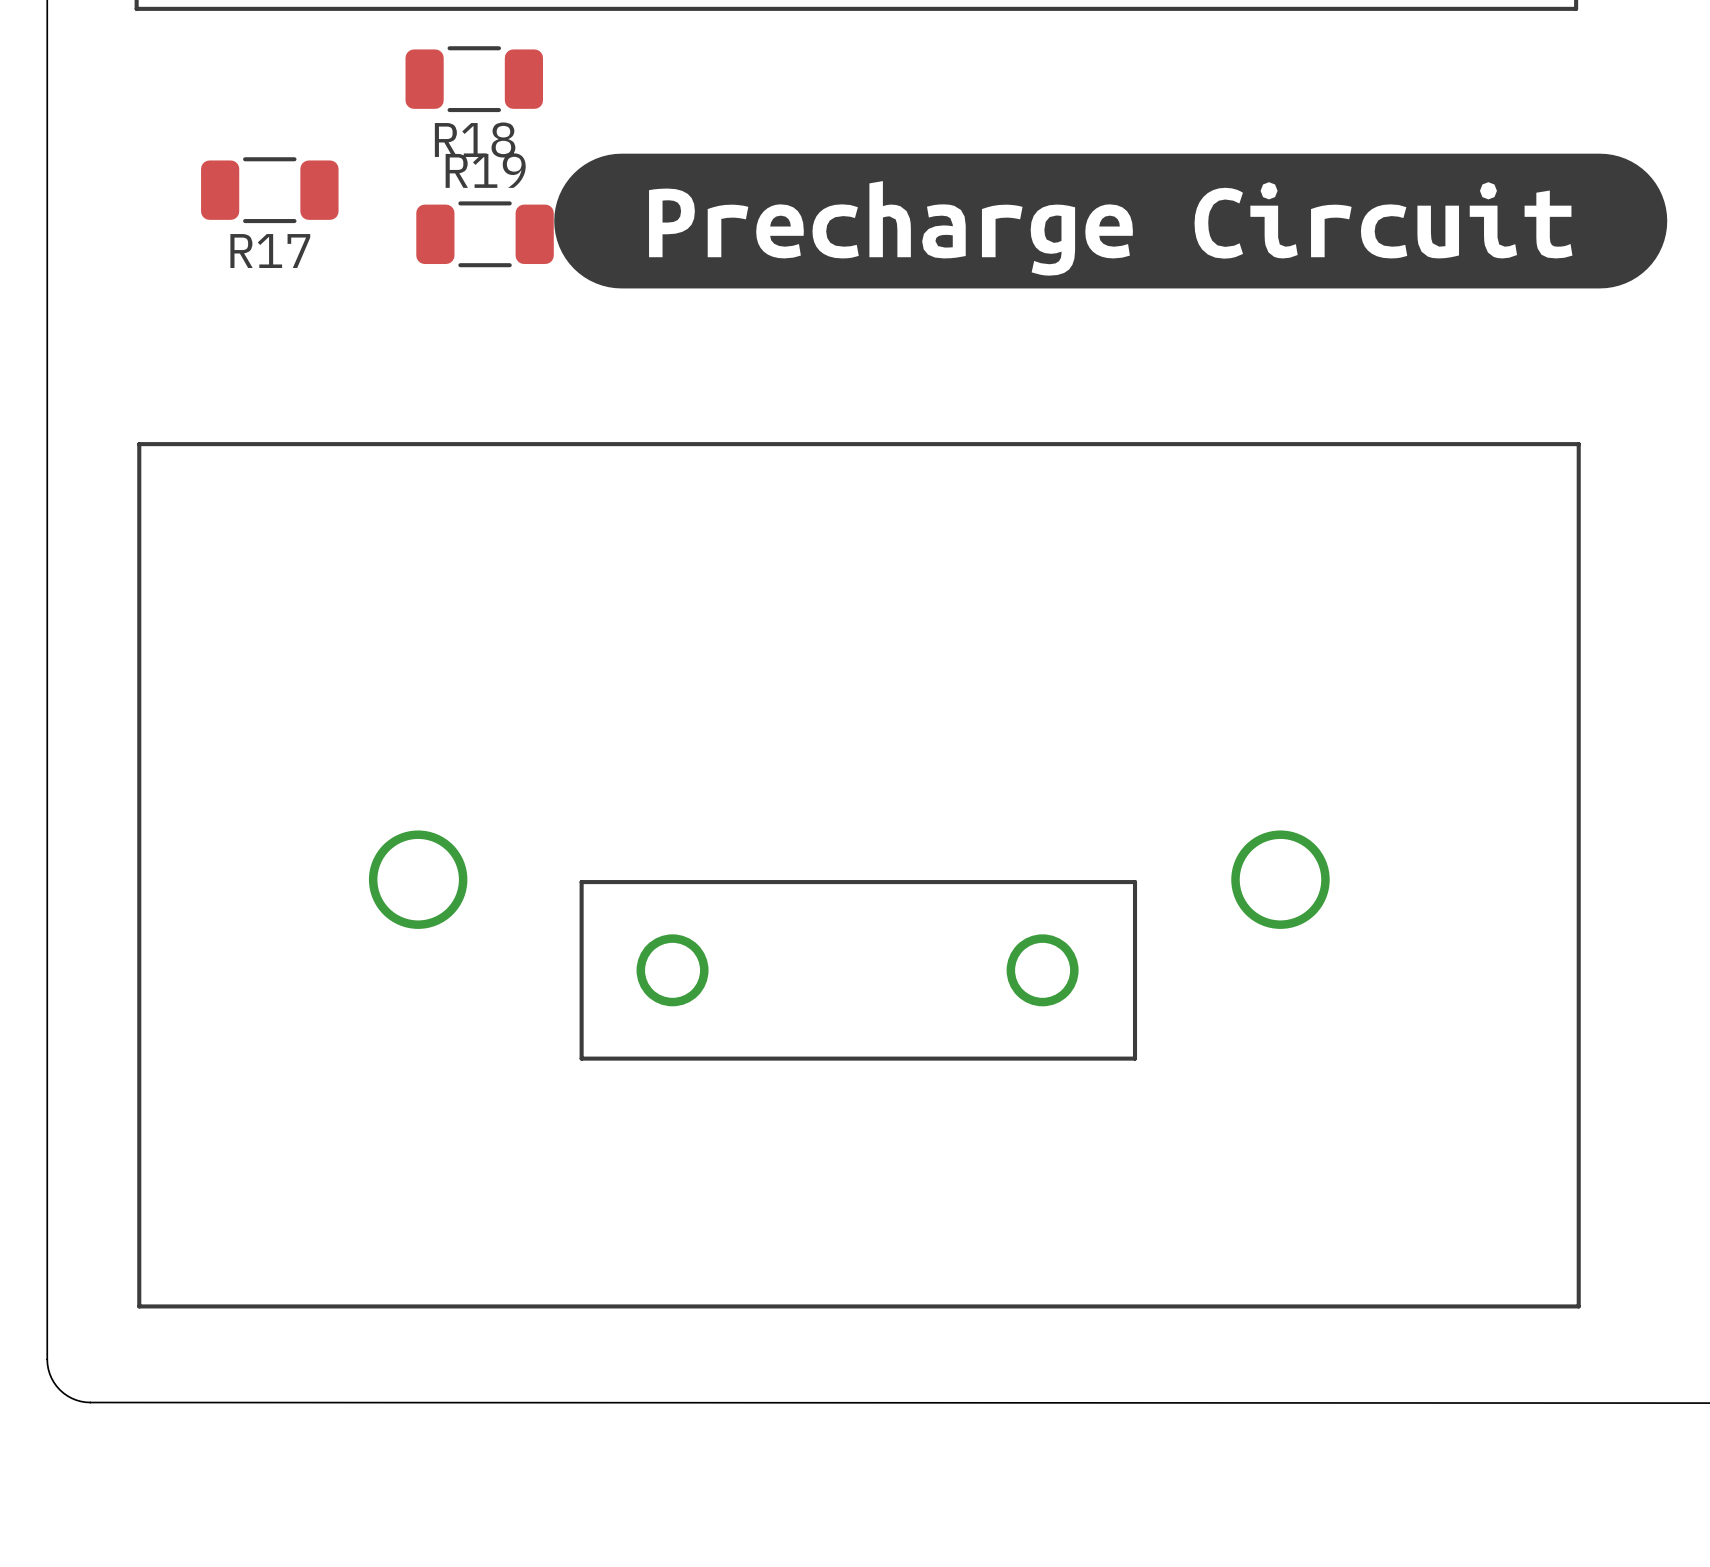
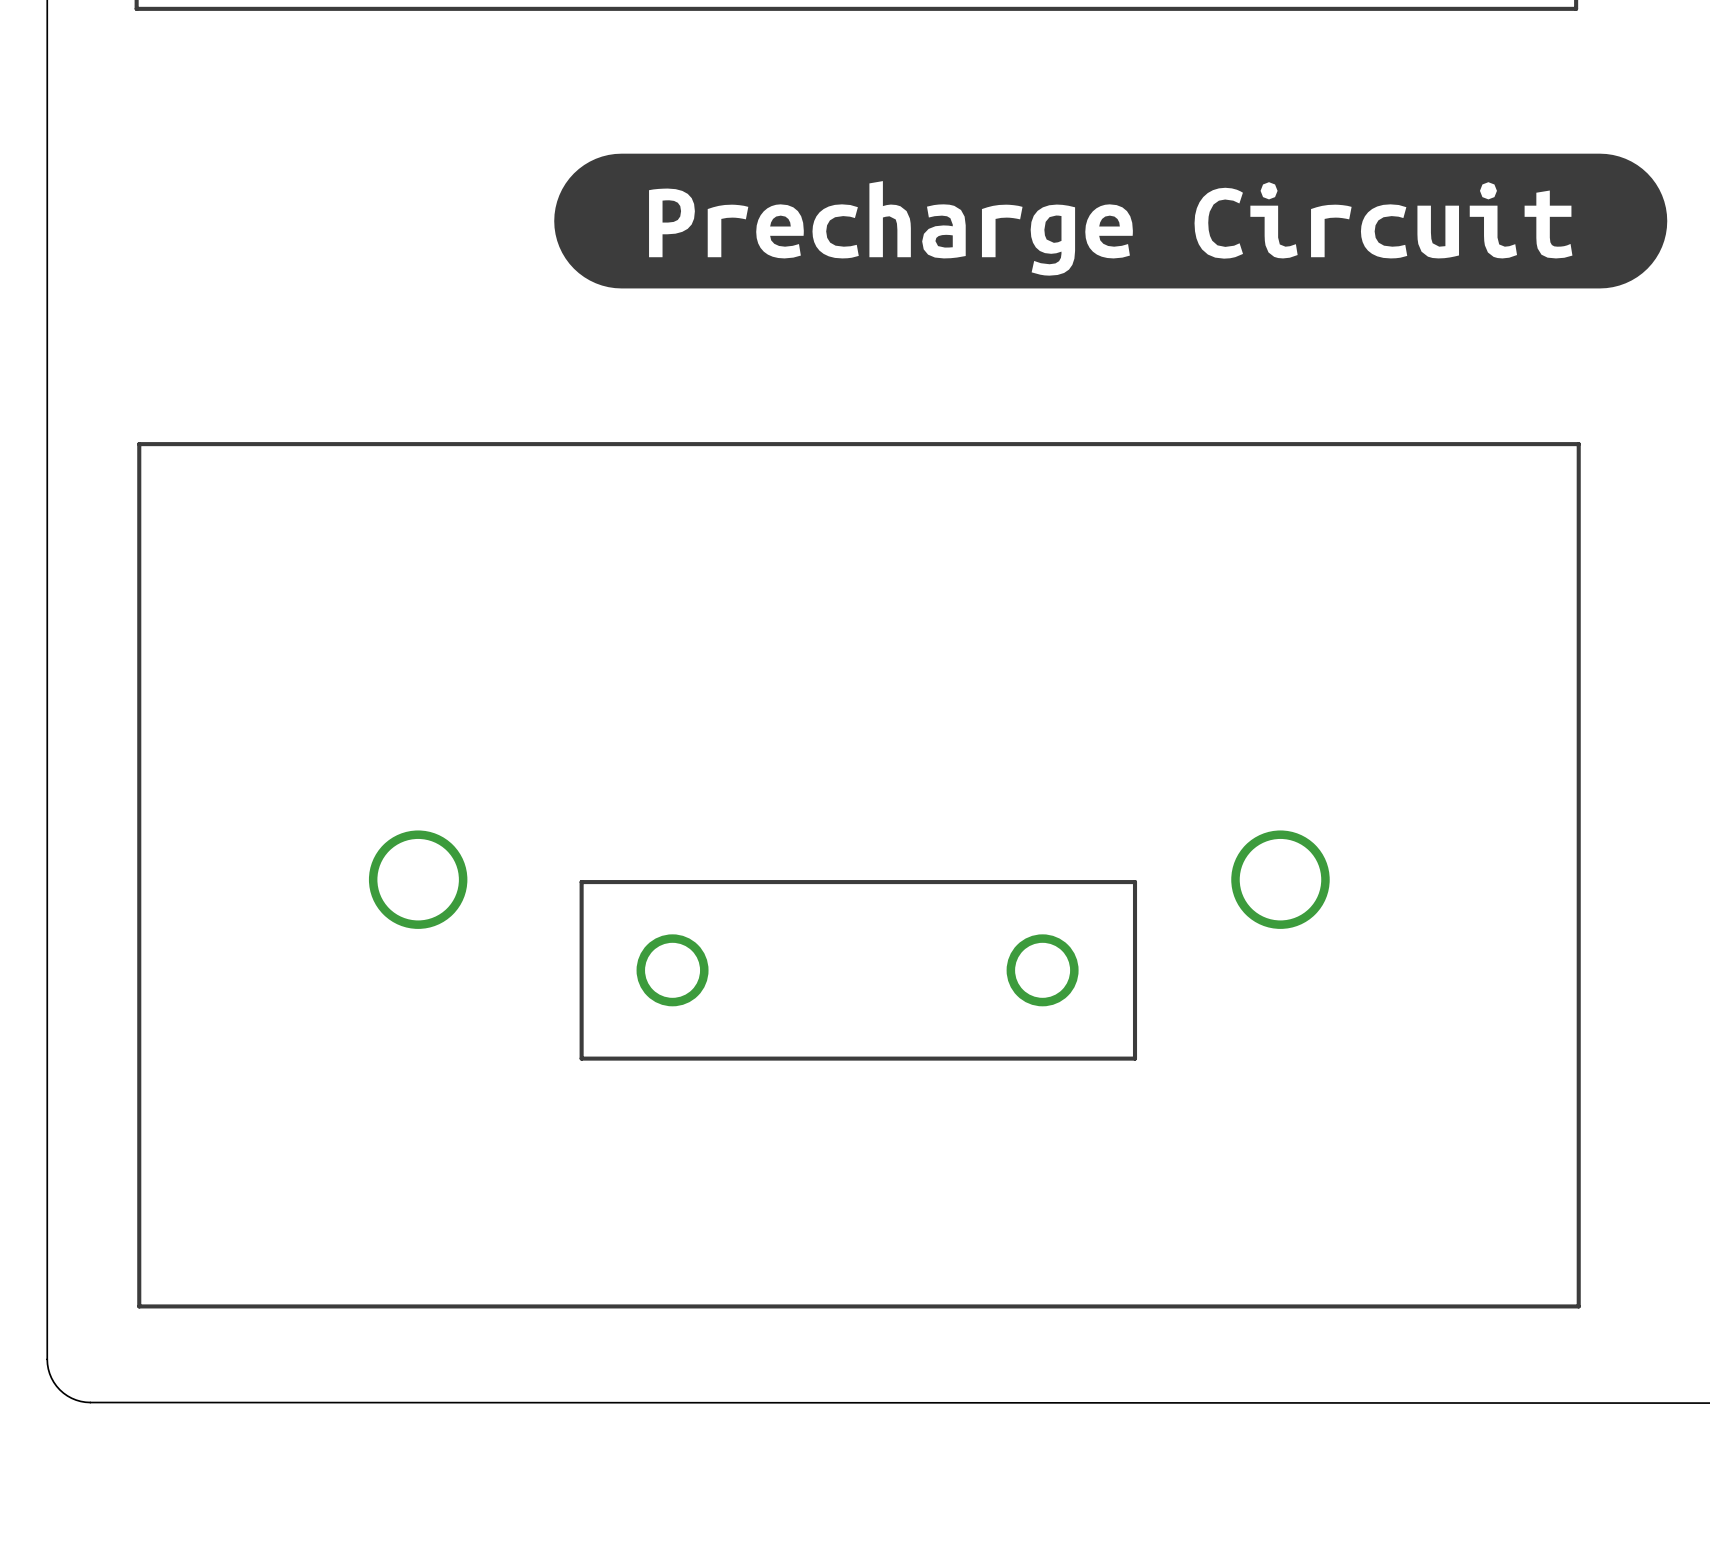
R18: (474, 79) -> none
R17: (269, 190) -> none
R19: (485, 234) -> none

